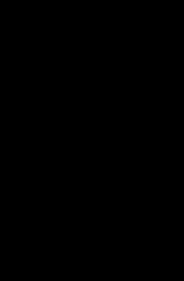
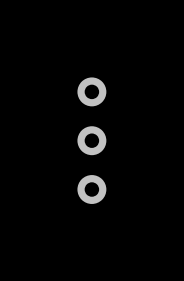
via: none -> (91, 91)
via: none -> (91, 140)
via: none -> (91, 189)

